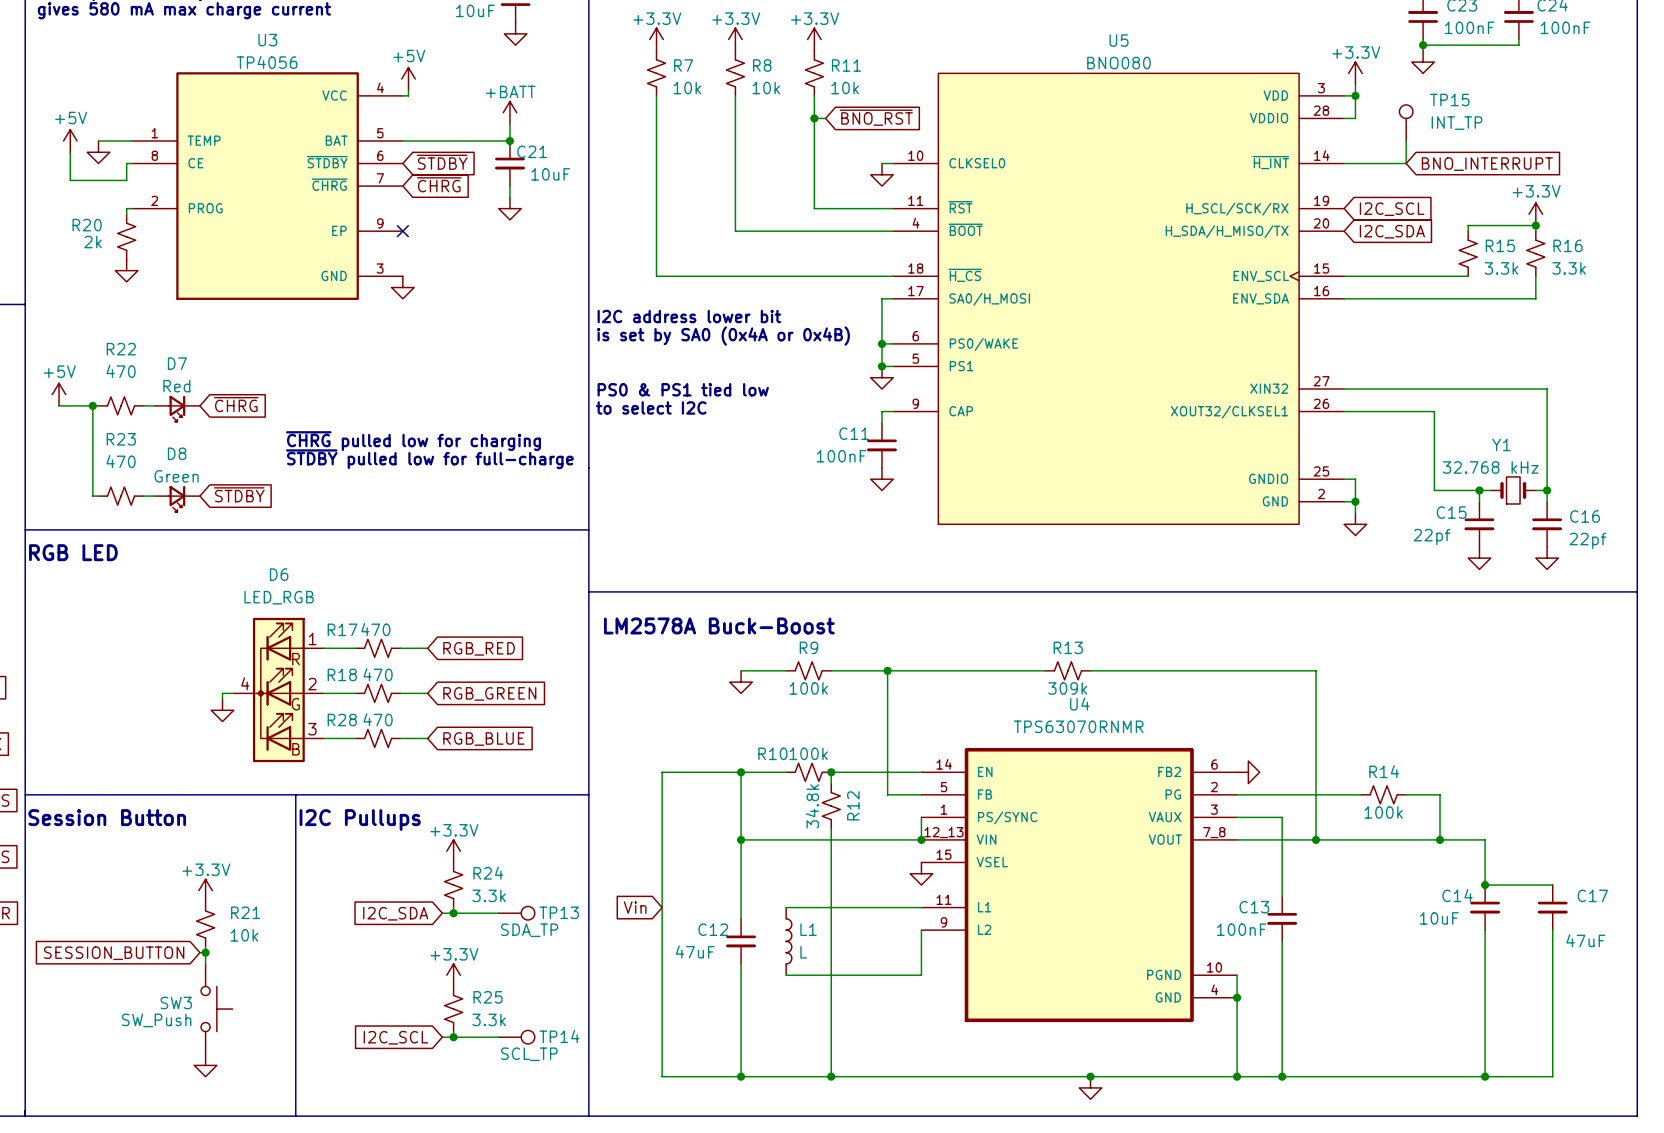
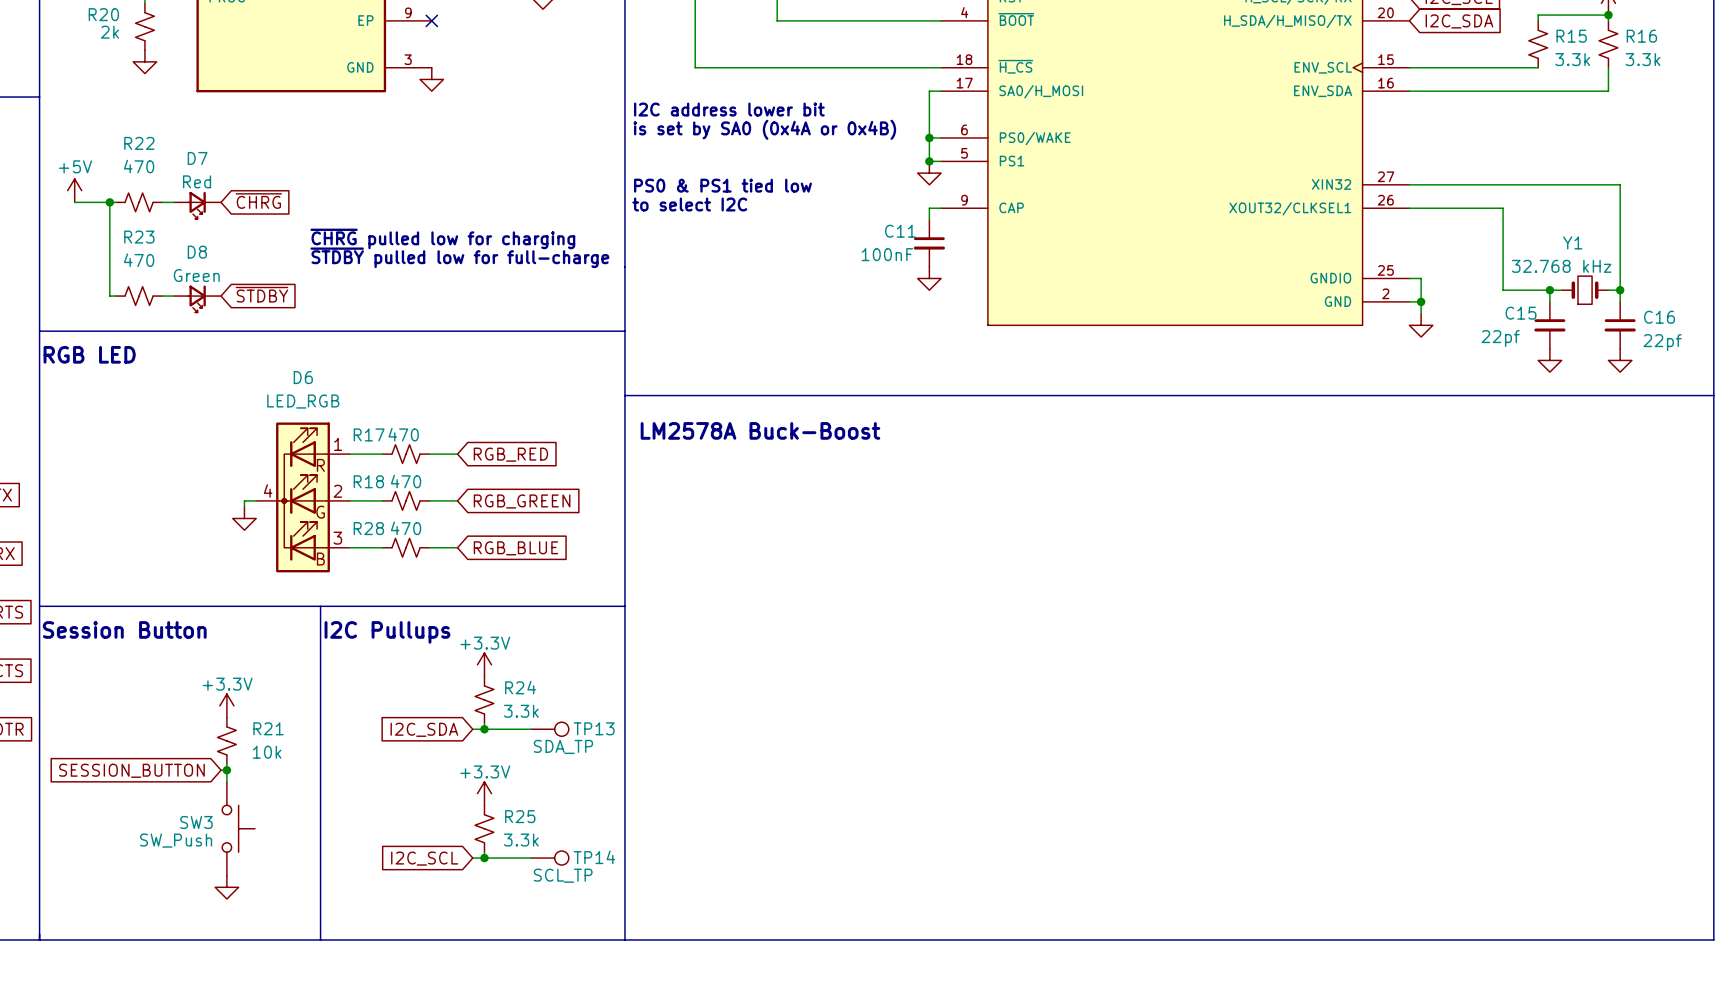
wire: (741, 670) (786, 670) -> none
R9: 100k (808, 670) -> none
wire: (831, 670) (1045, 670) -> none
wire: (887, 670) (887, 794) (921, 794) -> none
junction: (887, 670) -> none
R13: 309k (1067, 670) -> none
wire: (1090, 670) (1316, 670) (1316, 839) -> none
power symbol: (741, 682) -> none
wire: (741, 772) (741, 918) -> none
junction: (741, 772) -> none
wire: (786, 772) (662, 772) (662, 1076) (1552, 1076) (1552, 930) -> none
R10: 100k (808, 772) -> none
junction: (831, 772) -> none
wire: (921, 772) (831, 772) (831, 783) -> none
power symbol: (1248, 772) -> none
wire: (1237, 794) (1361, 794) -> none
R14: 100k (1383, 794) -> none
wire: (1406, 794) (1440, 794) (1440, 839) -> none
R12: 34.8k (831, 806) -> none
wire: (921, 817) (921, 839) (741, 839) -> none
wire: (1237, 817) (1282, 817) (1282, 896) -> none
wire: (831, 828) (831, 1076) -> none
junction: (741, 839) -> none
junction: (921, 839) -> none
wire: (1237, 839) (1485, 839) (1485, 885) (1552, 885) -> none
junction: (1316, 839) -> none
junction: (1440, 839) -> none
power symbol: (921, 873) -> none
U4: TPS63070RNMR (1079, 885) -> none
junction: (1485, 885) -> none
global label: Vin (635, 907) -> none
wire: (786, 907) (921, 907) -> none
C14: 10uF (1485, 907) -> none
C17: 47uF (1552, 907) -> none
C13: 100nF (1282, 918) -> none
wire: (921, 930) (921, 975) (786, 975) -> none
wire: (1485, 930) (1485, 1076) -> none
C12: 47uF (741, 941) -> none
L1: L (788, 941) -> none
wire: (1282, 941) (1282, 1076) -> none
wire: (741, 963) (741, 1076) -> none
wire: (1237, 975) (1237, 1076) -> none
junction: (1237, 997) -> none
junction: (741, 1076) -> none
junction: (831, 1076) -> none
junction: (1090, 1076) -> none
junction: (1237, 1076) -> none
junction: (1282, 1076) -> none
junction: (1485, 1076) -> none
power symbol: (1090, 1087) -> none

